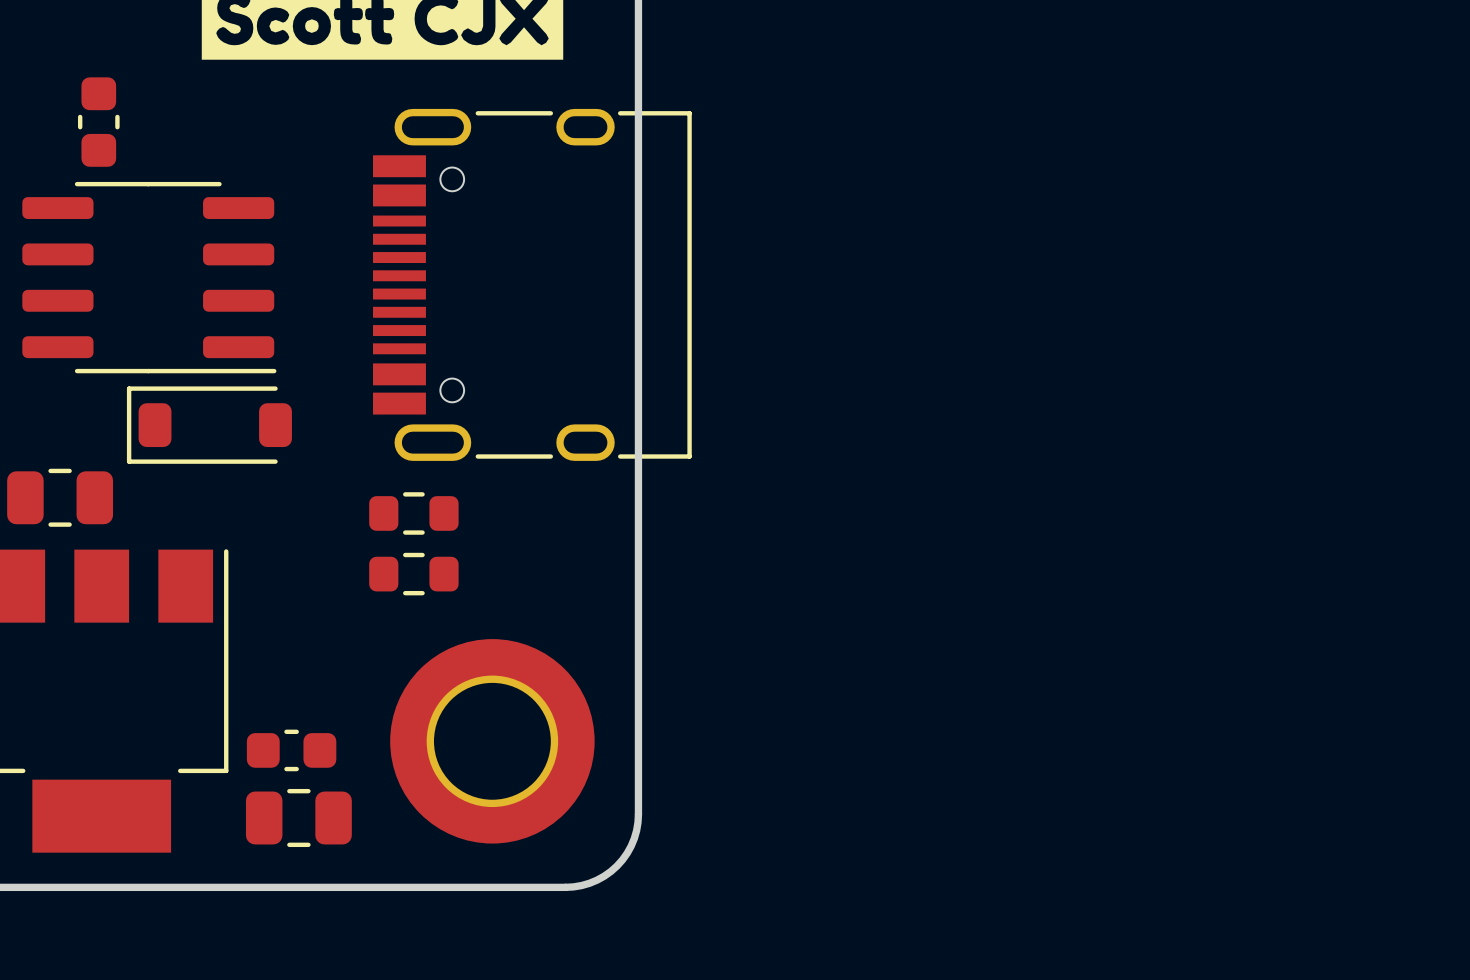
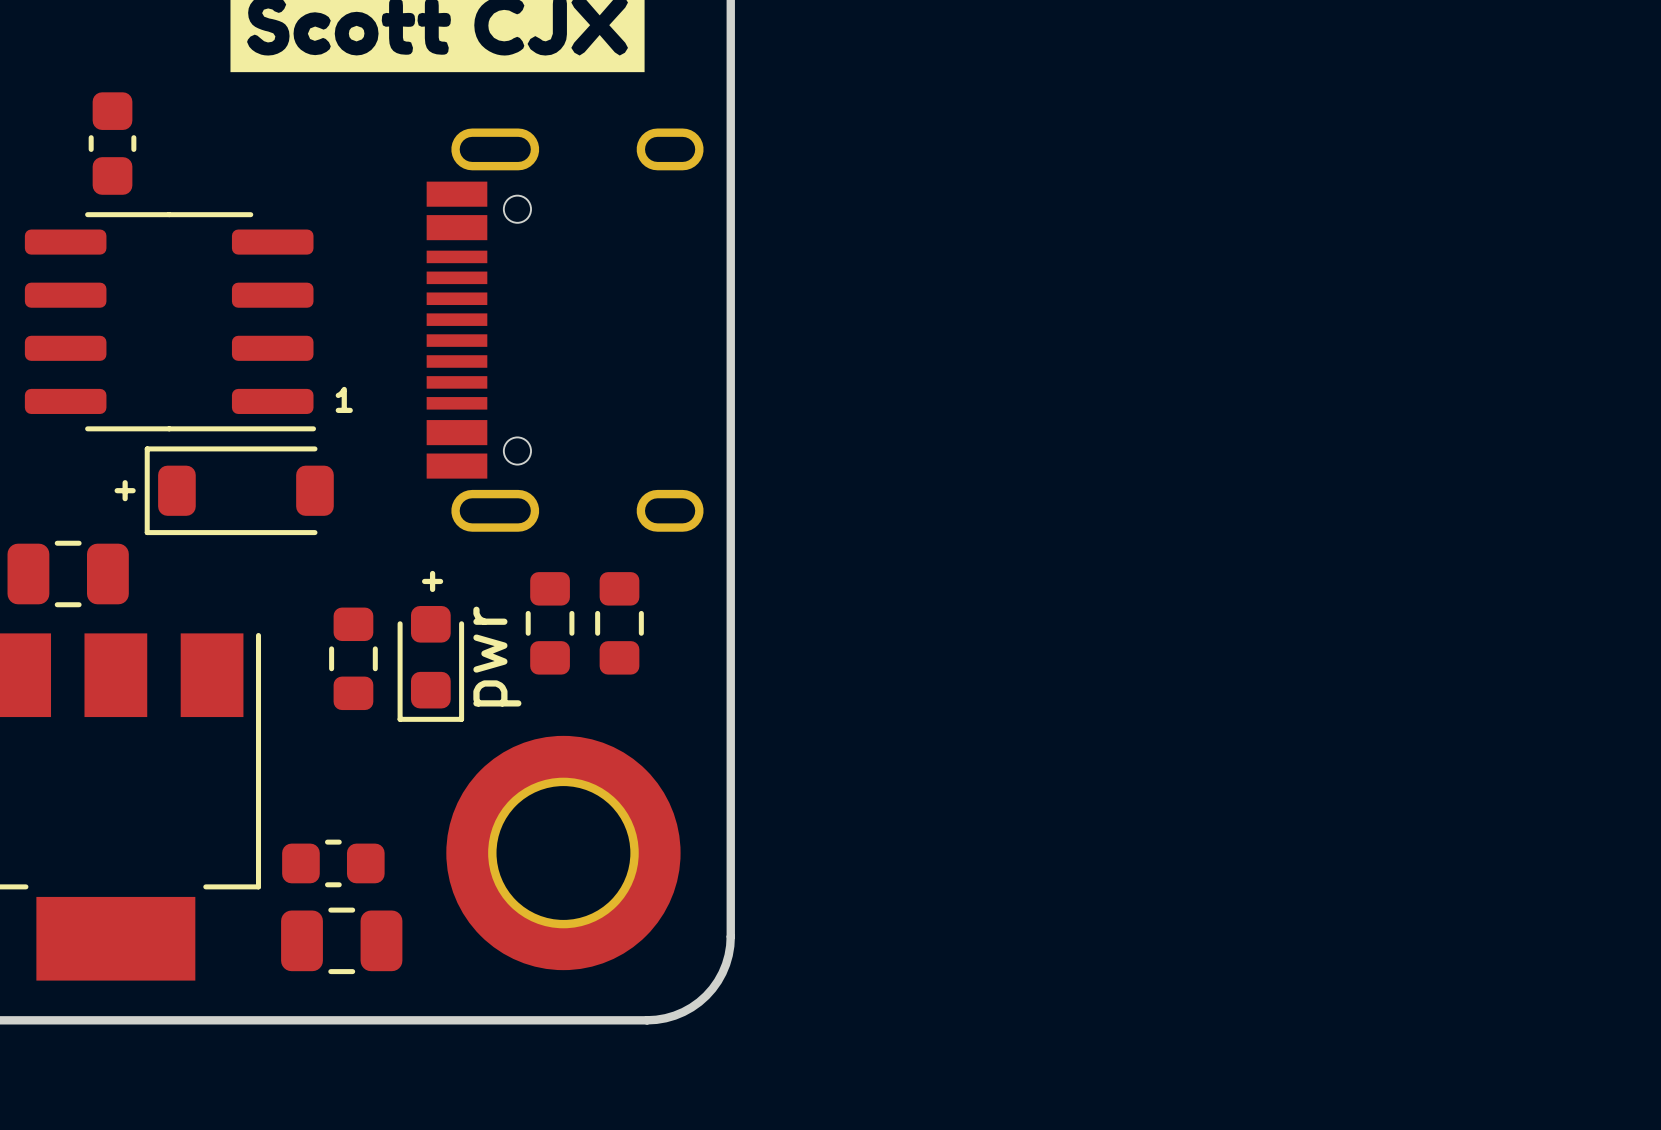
part: (532, 284) -> none
text: none -> 1 (344, 399)
text: none -> + (125, 490)
text: none -> + (432, 581)
part: (413, 513) -> none
part: none -> (550, 623)
part: none -> (619, 623)
part: none -> (353, 658)
part: (413, 574) -> none
text: none -> pwr (497, 656)
part: none -> (430, 663)

